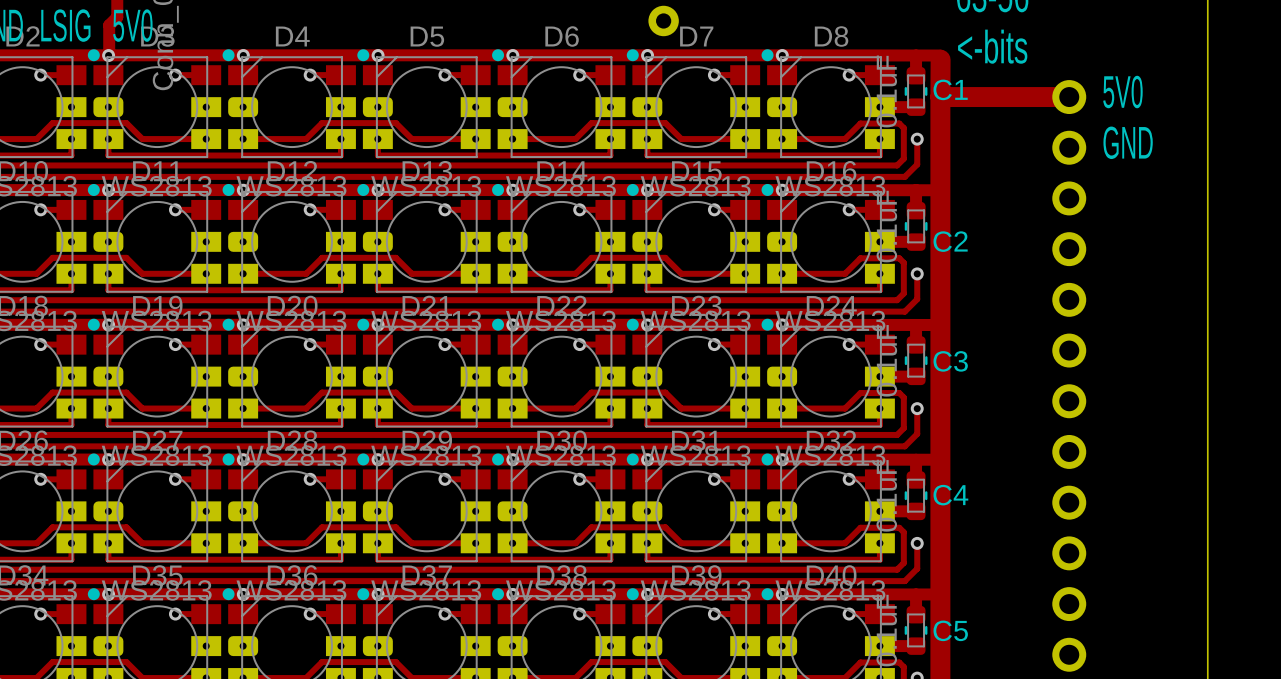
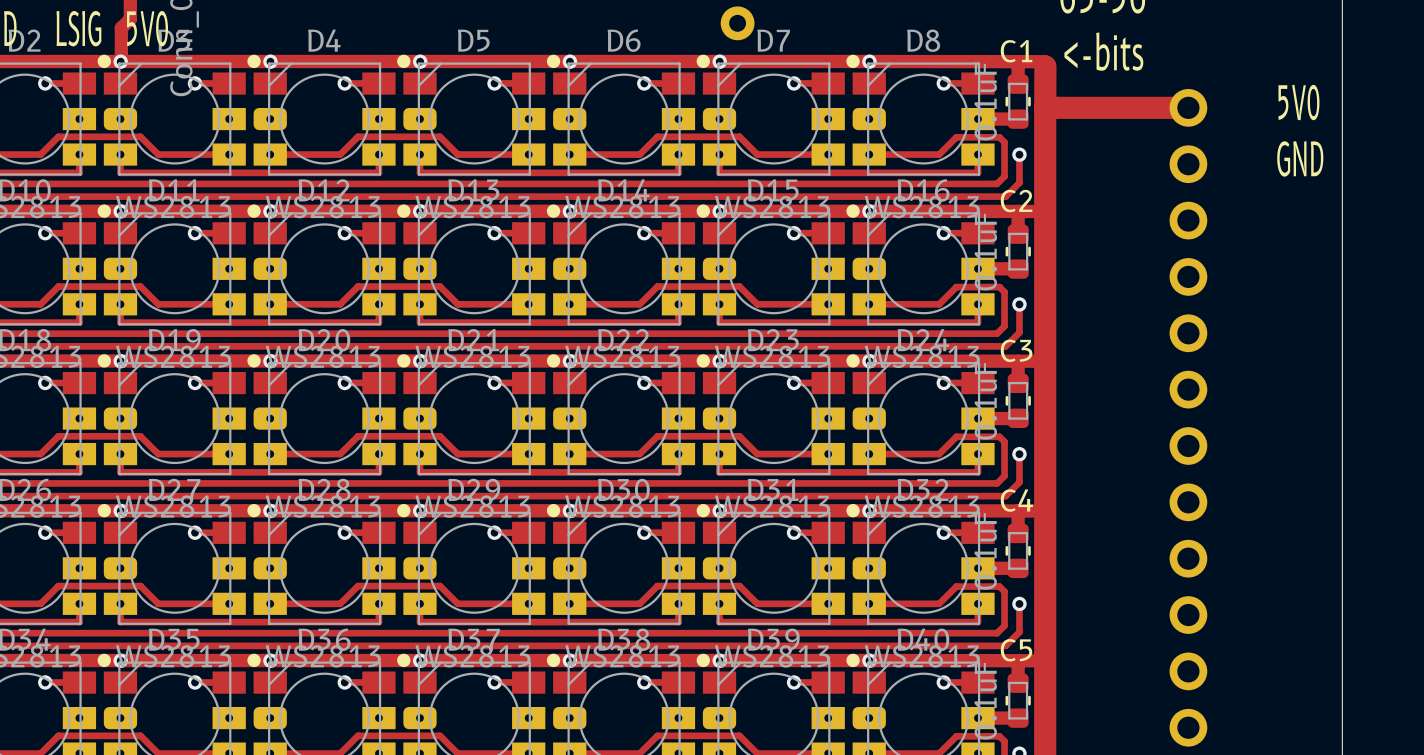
C1 name position: C1 (950, 89) -> C1 (1016, 51)
text position: 5V0 (1122, 92) -> 5V0 (1298, 102)
text position: GND (1128, 142) -> GND (1300, 158)
C2 name position: C2 (950, 241) -> C2 (1016, 201)
C3 name position: C3 (950, 361) -> C3 (1016, 350)
C4 name position: C4 (950, 495) -> C4 (1016, 500)
C5 name position: C5 (950, 630) -> C5 (1016, 650)

